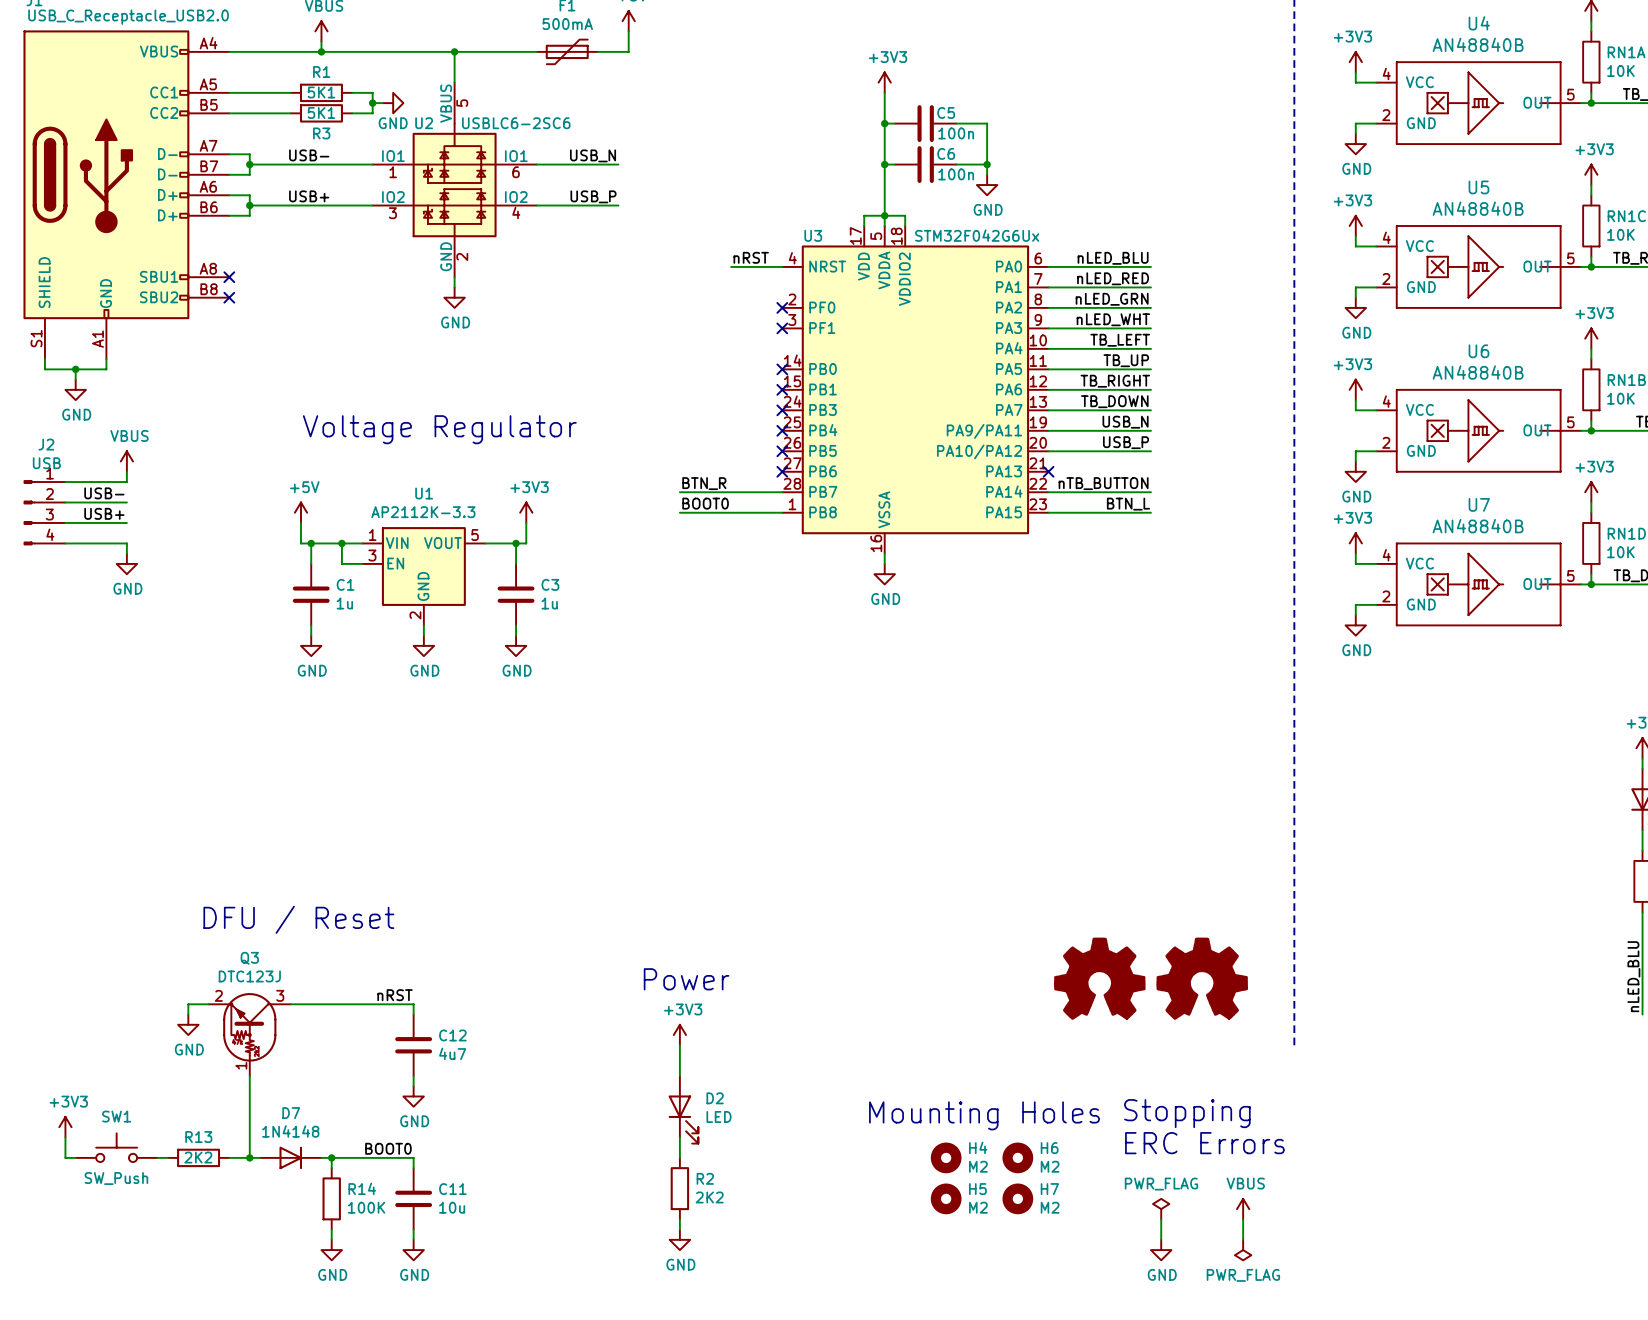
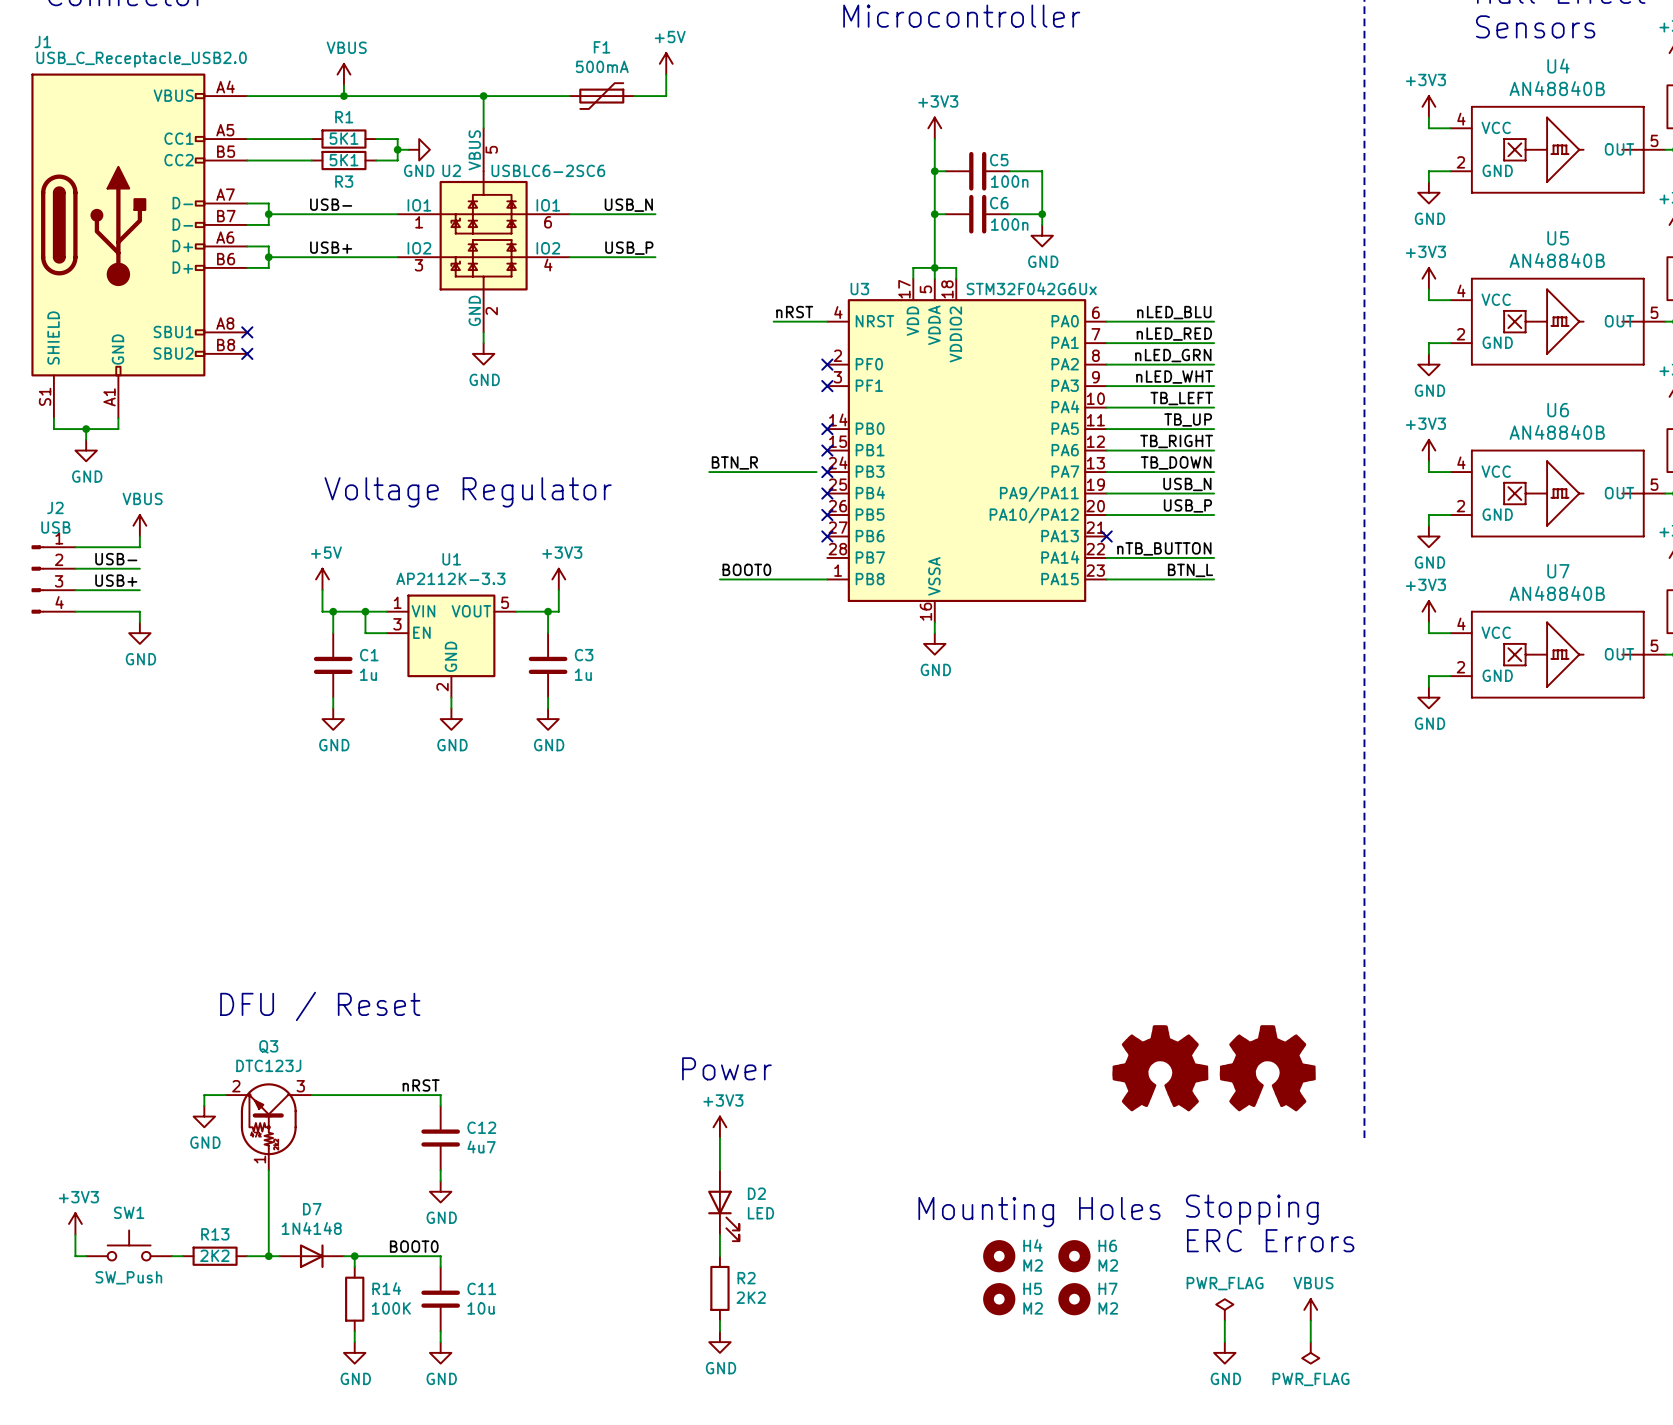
label position: BTN_R (704, 483) -> BTN_R (734, 462)
wire: (679, 492) (782, 492) -> (709, 472) (816, 472)

